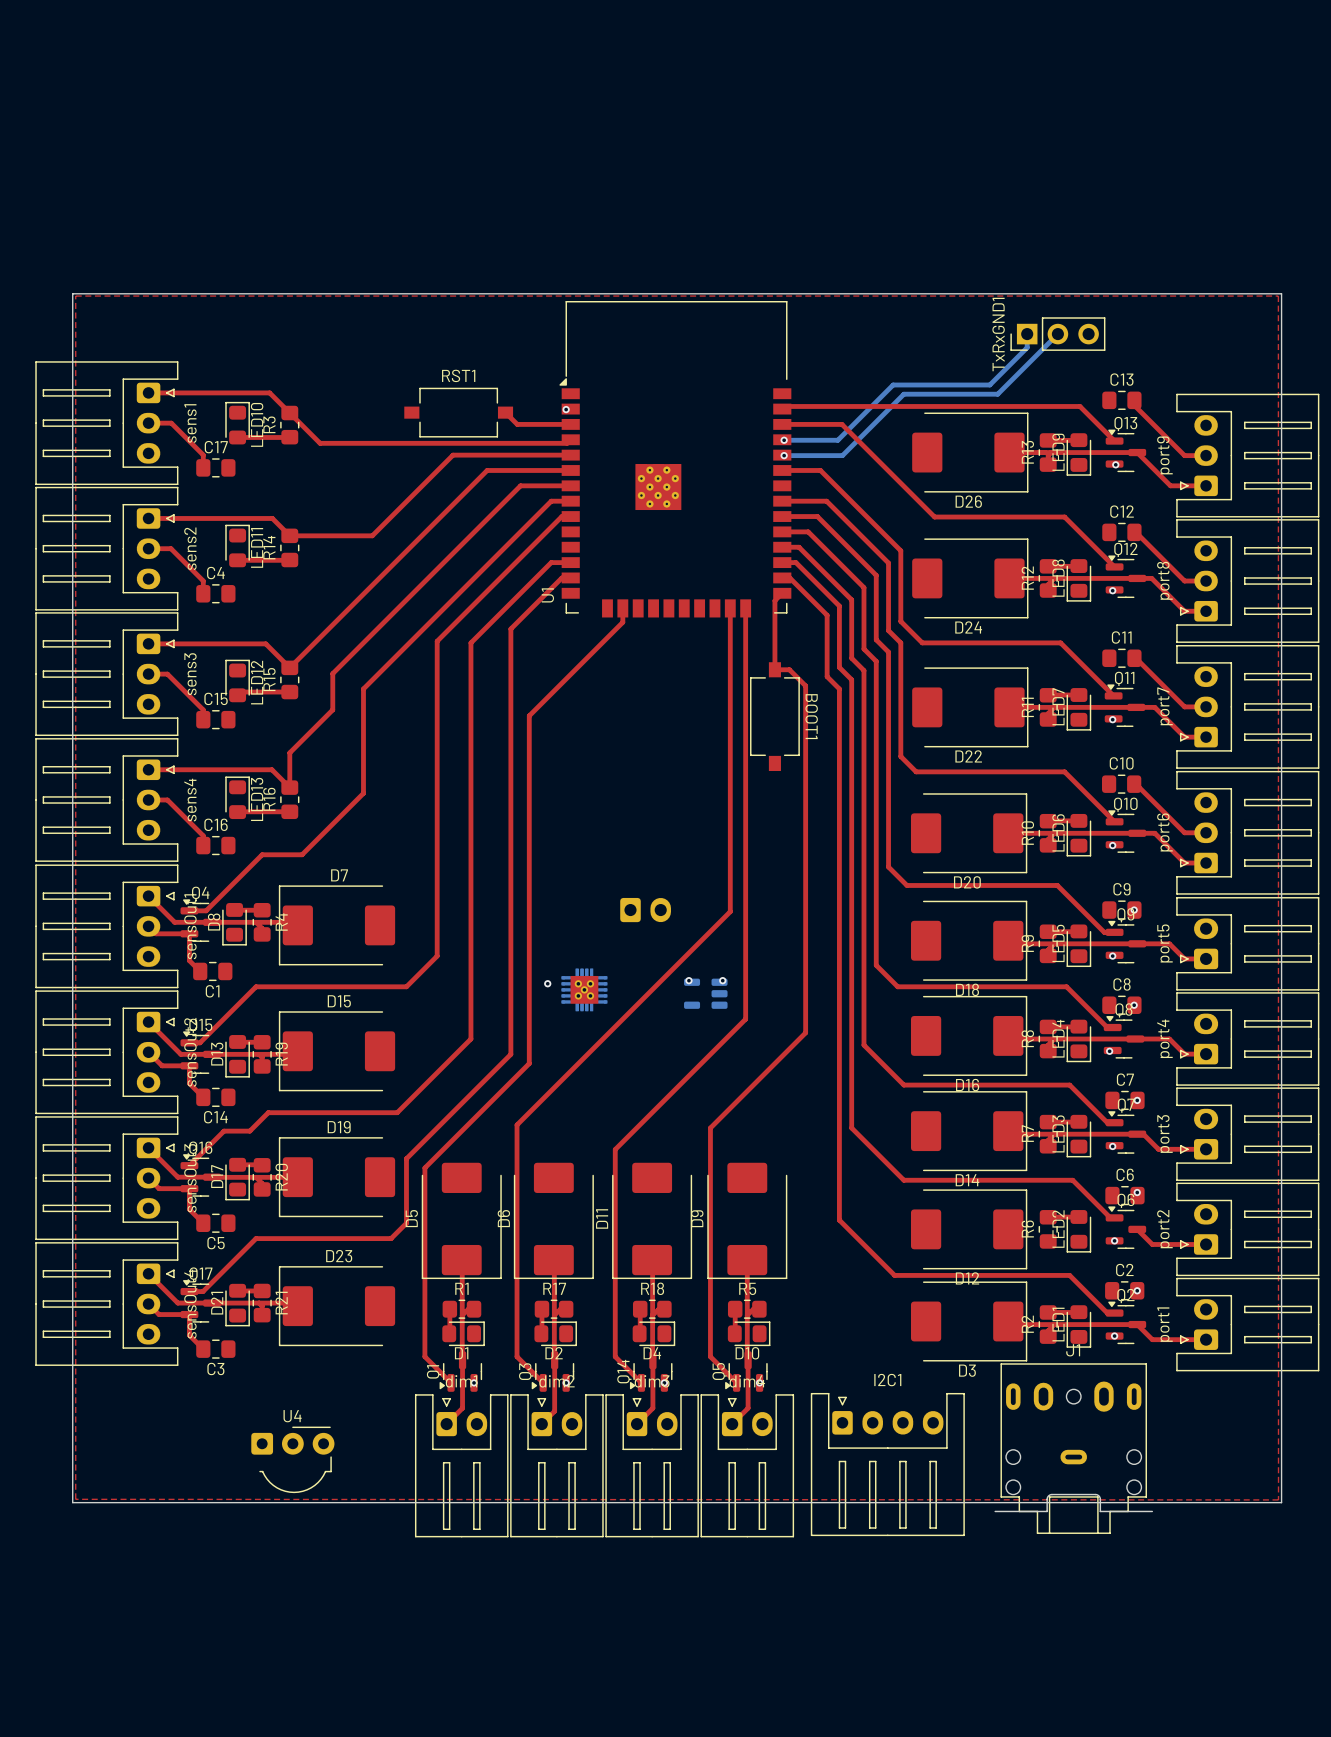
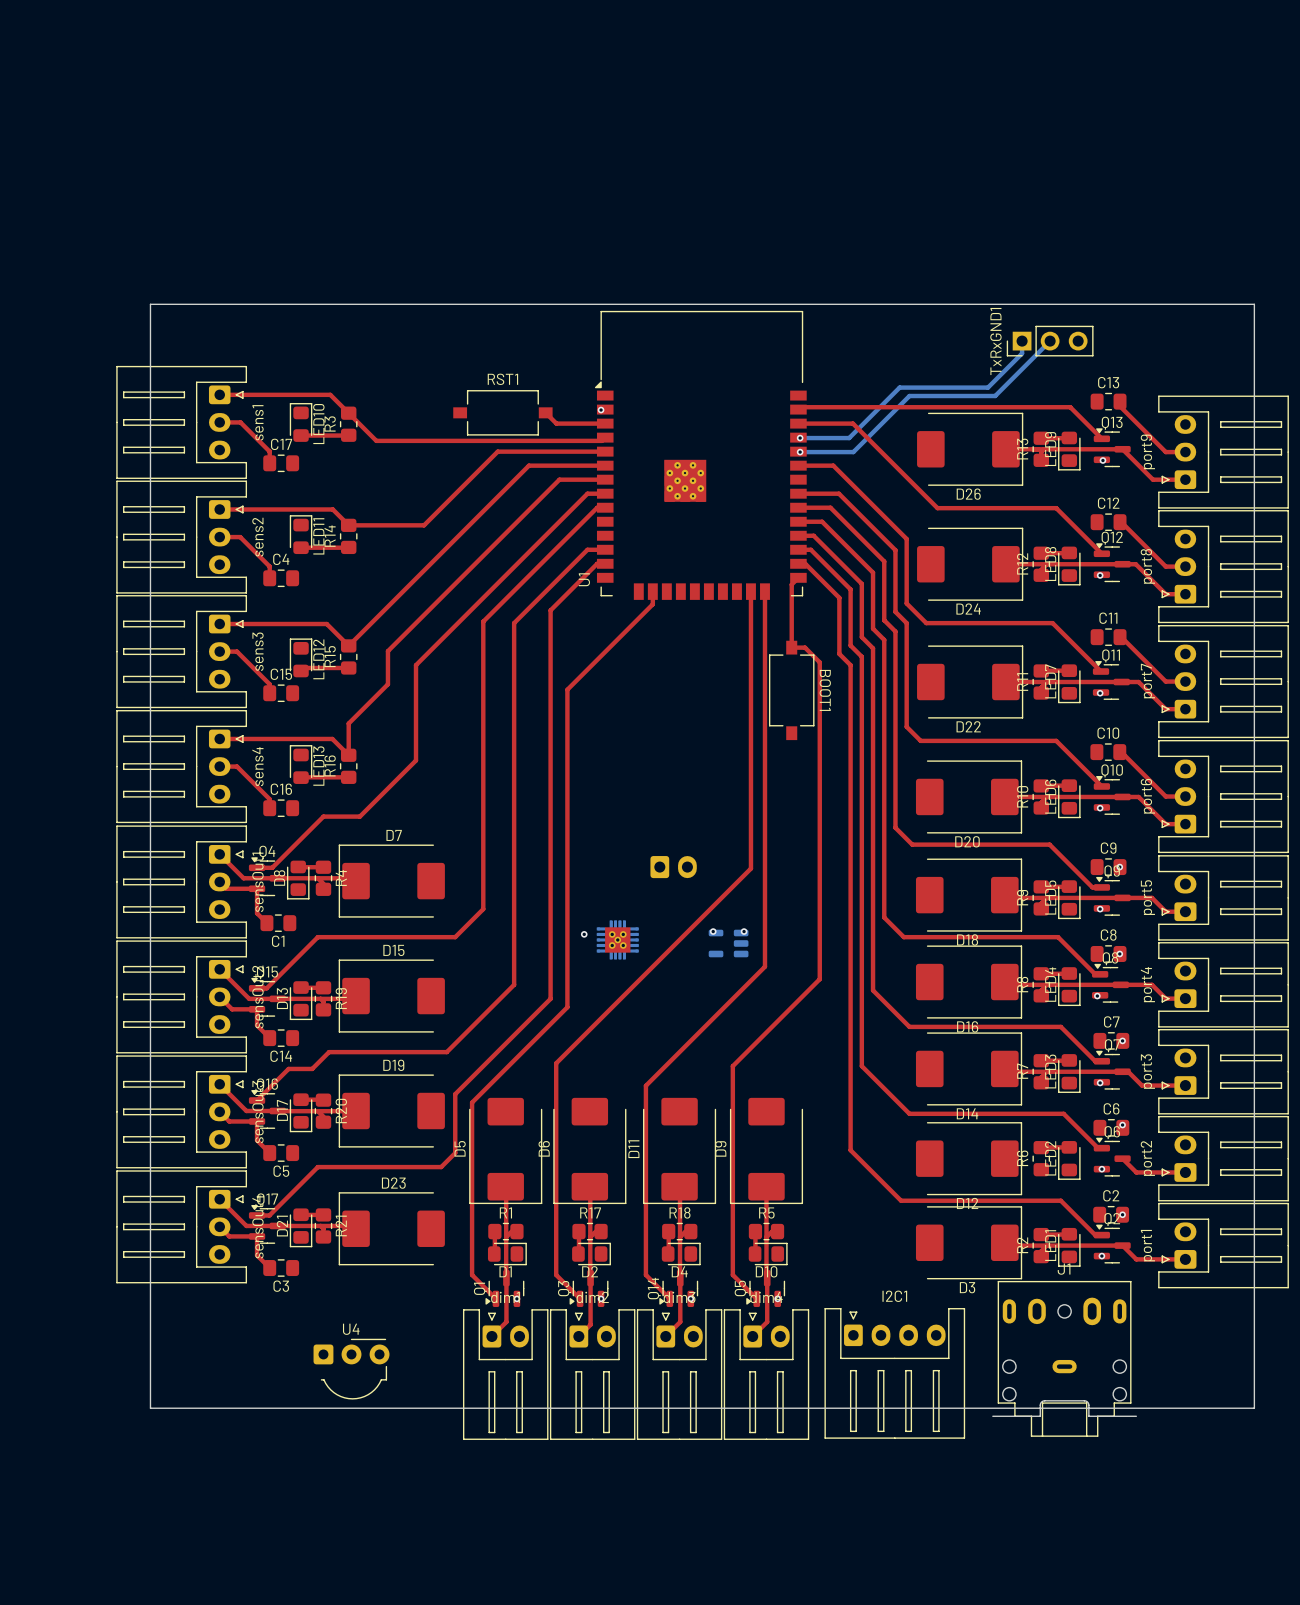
top zone outline: (75, 296) (1278, 296) (1278, 1499) (75, 1499) (75, 296) -> none

